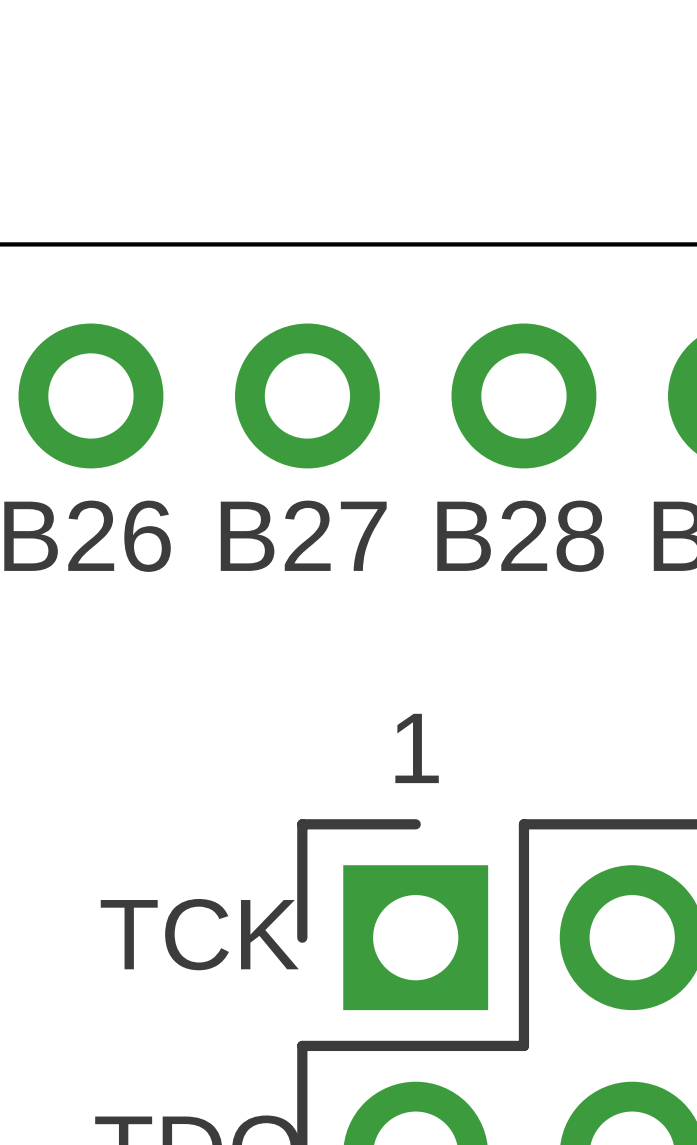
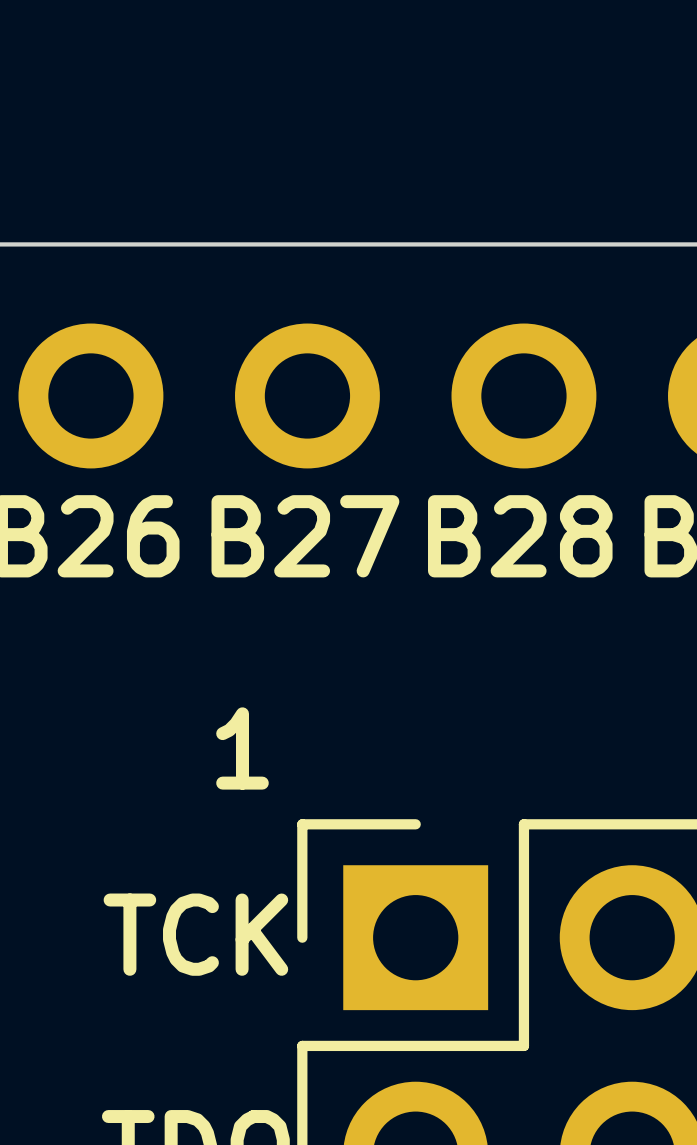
text position: 1 (417, 748) -> 1 (242, 748)

